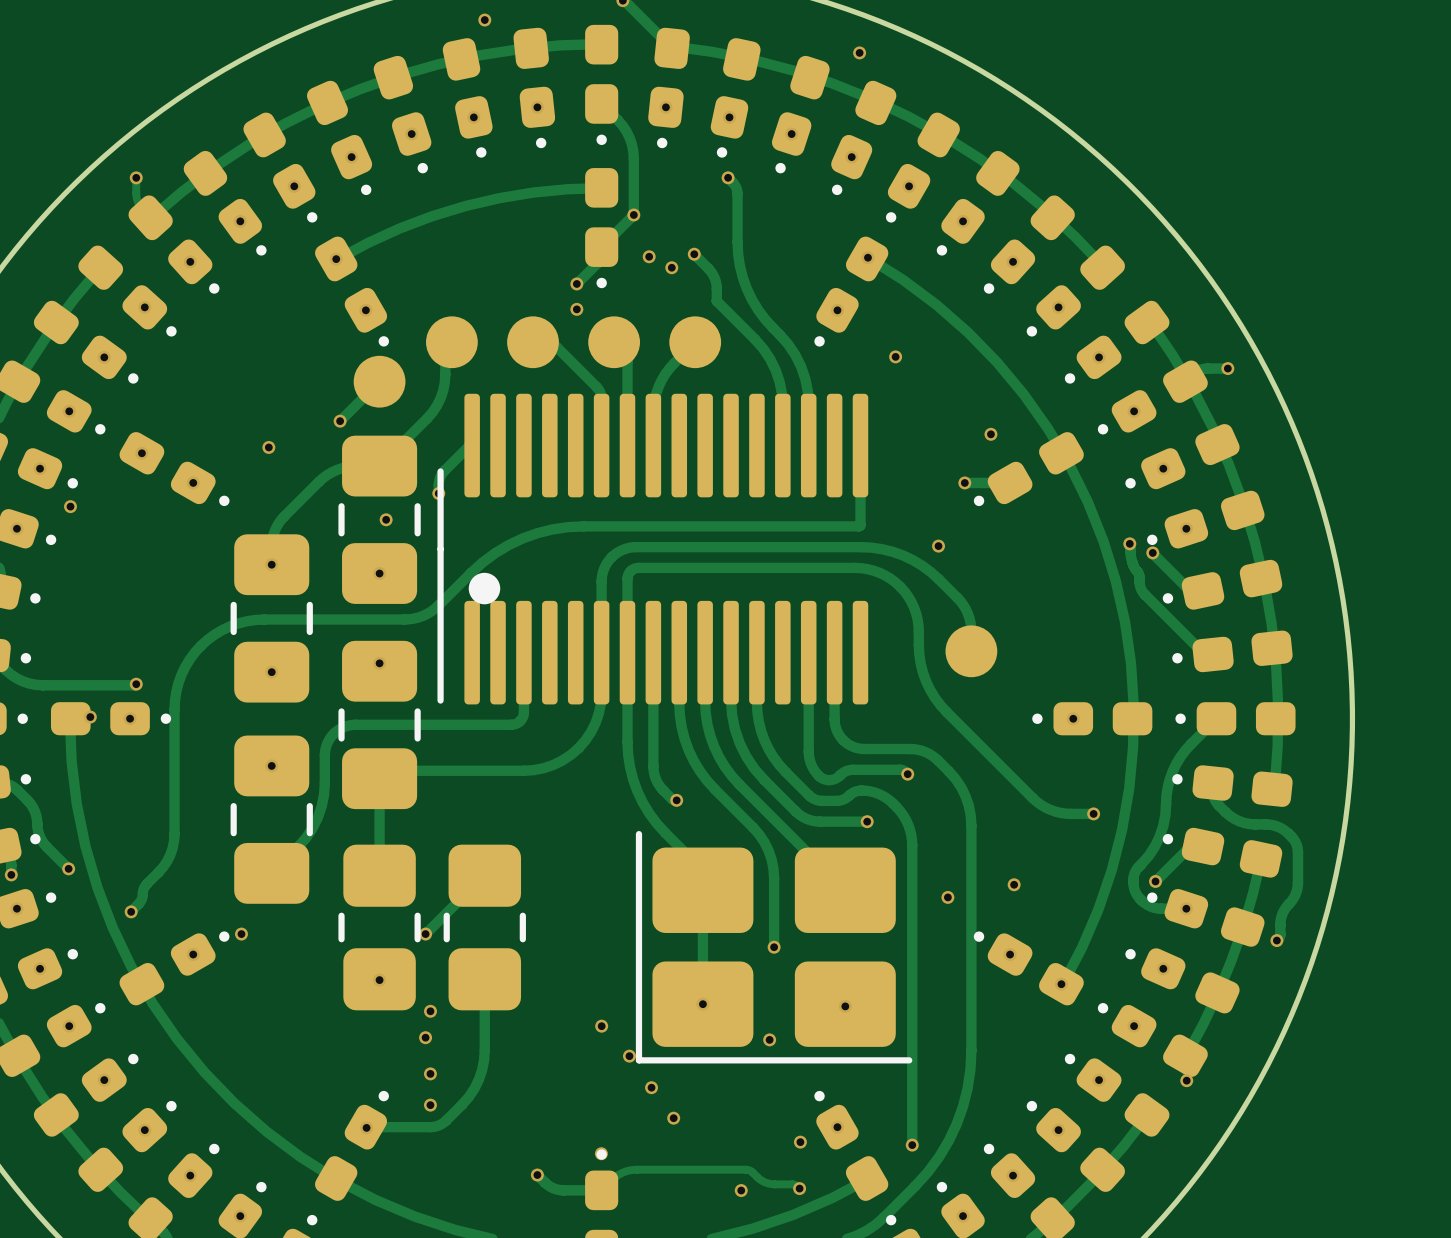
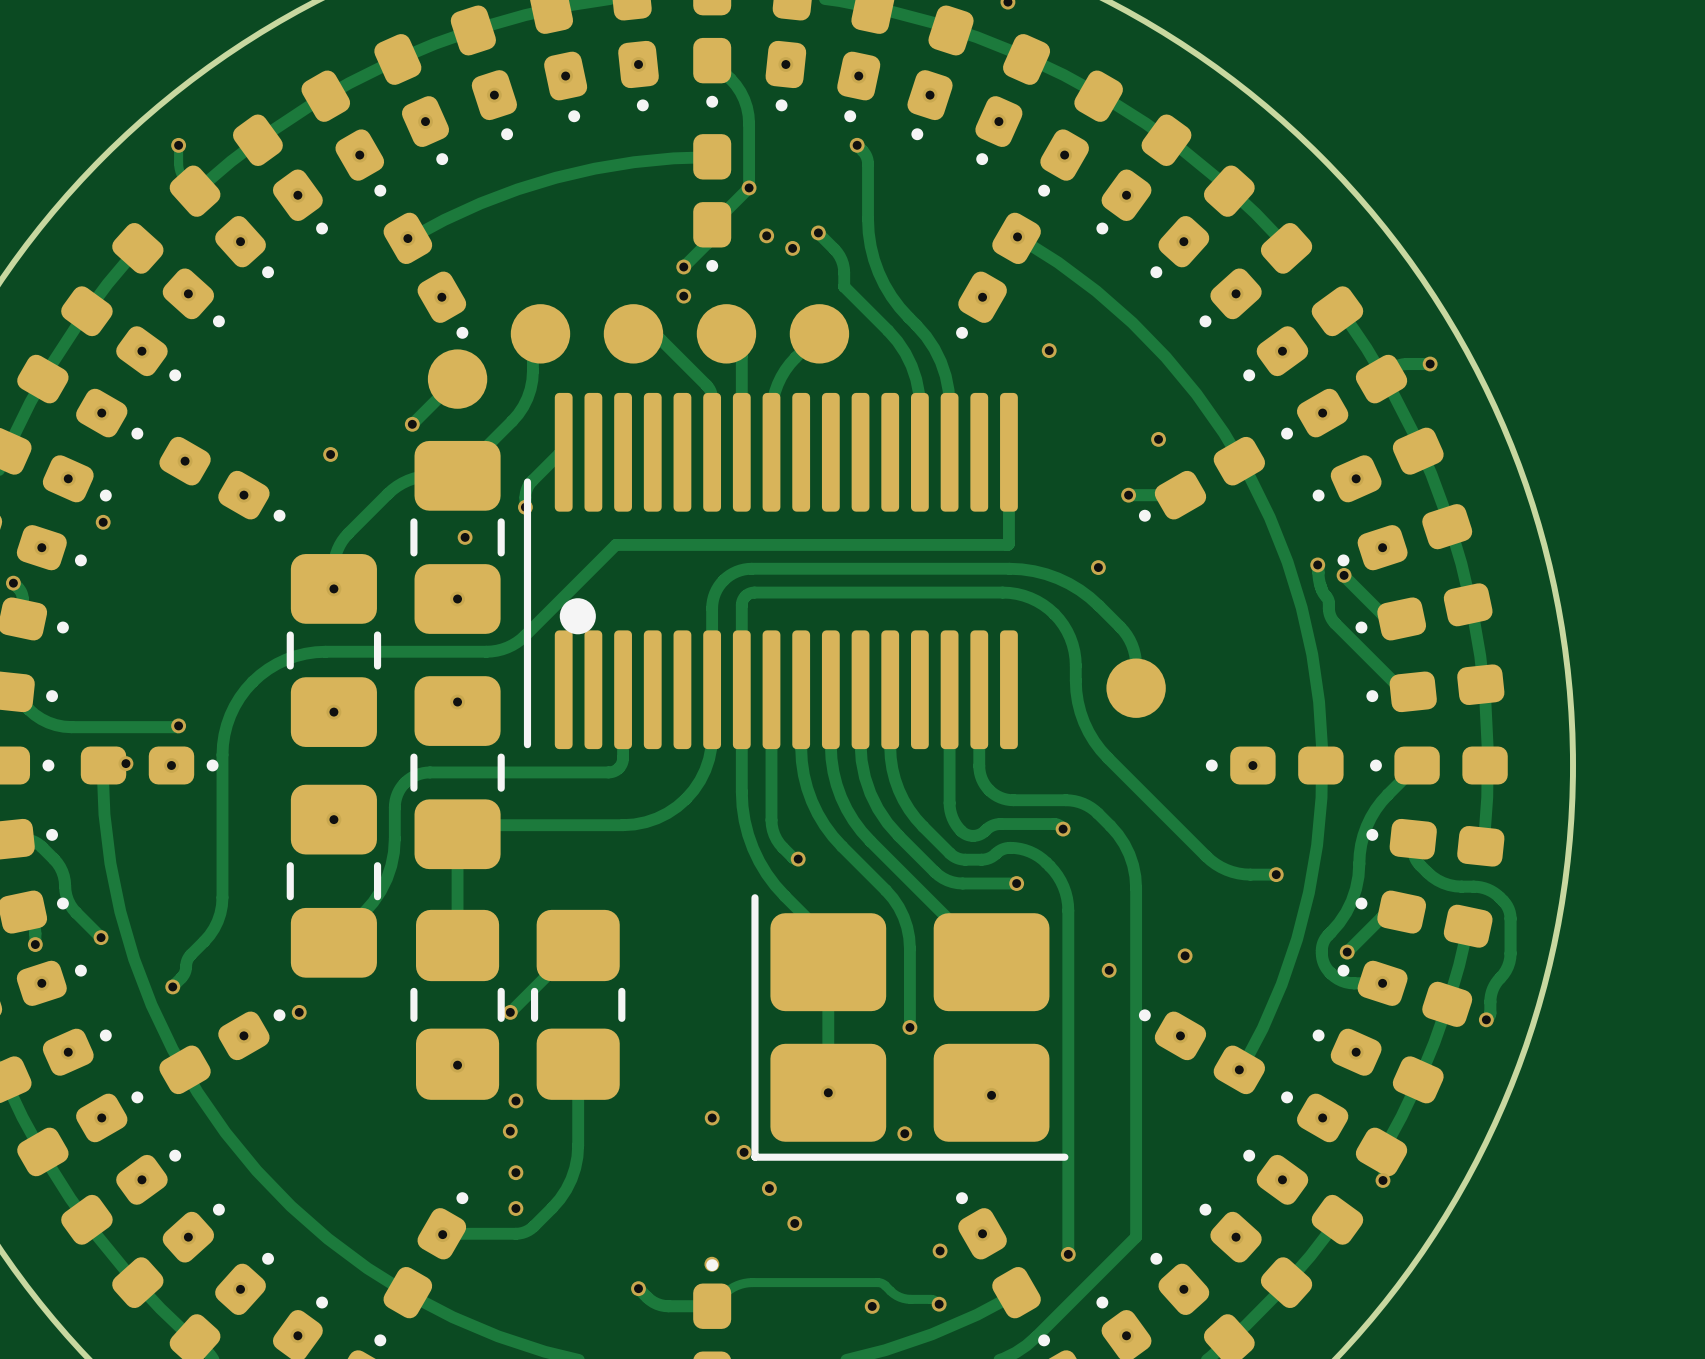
track: (583, 526) (552, 529) (522, 538) (495, 553) (471, 572) -> (691, 544) (615, 544) (562, 598)
track: (971, 1050) (967, 1087) (956, 1123) (939, 1157) (915, 1186) -> (1136, 1145) (1136, 1237) (1071, 1301)

